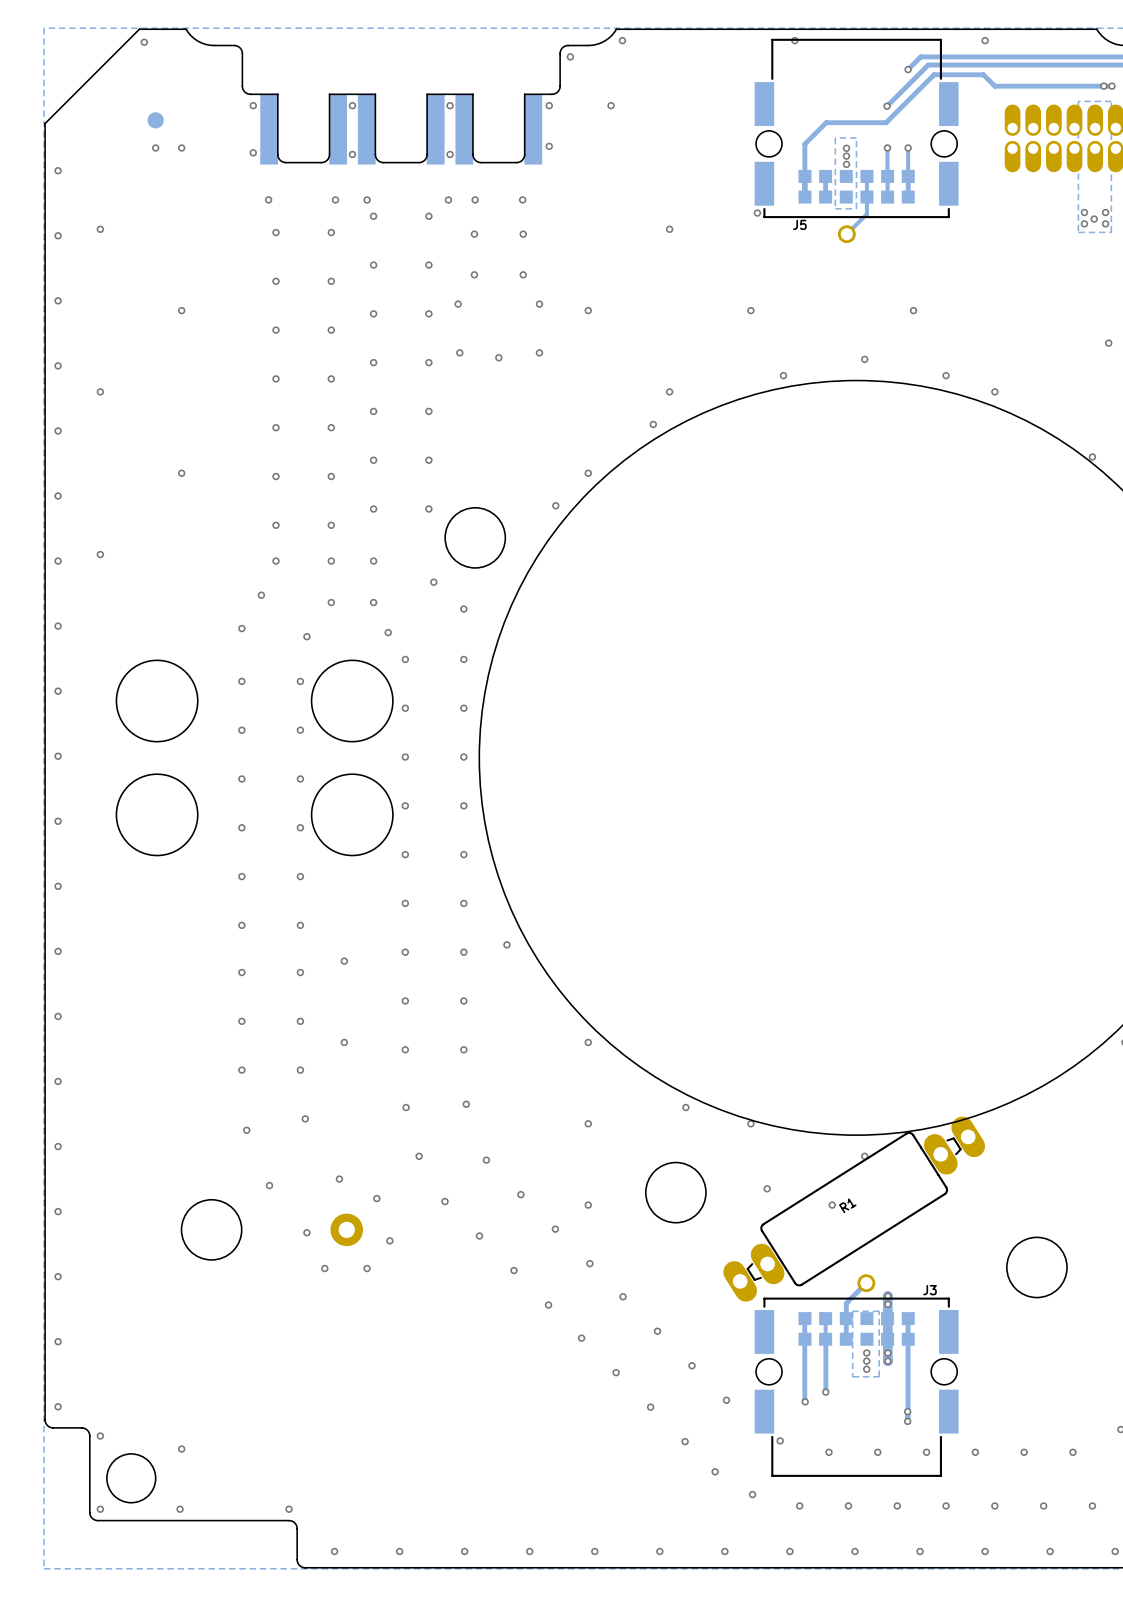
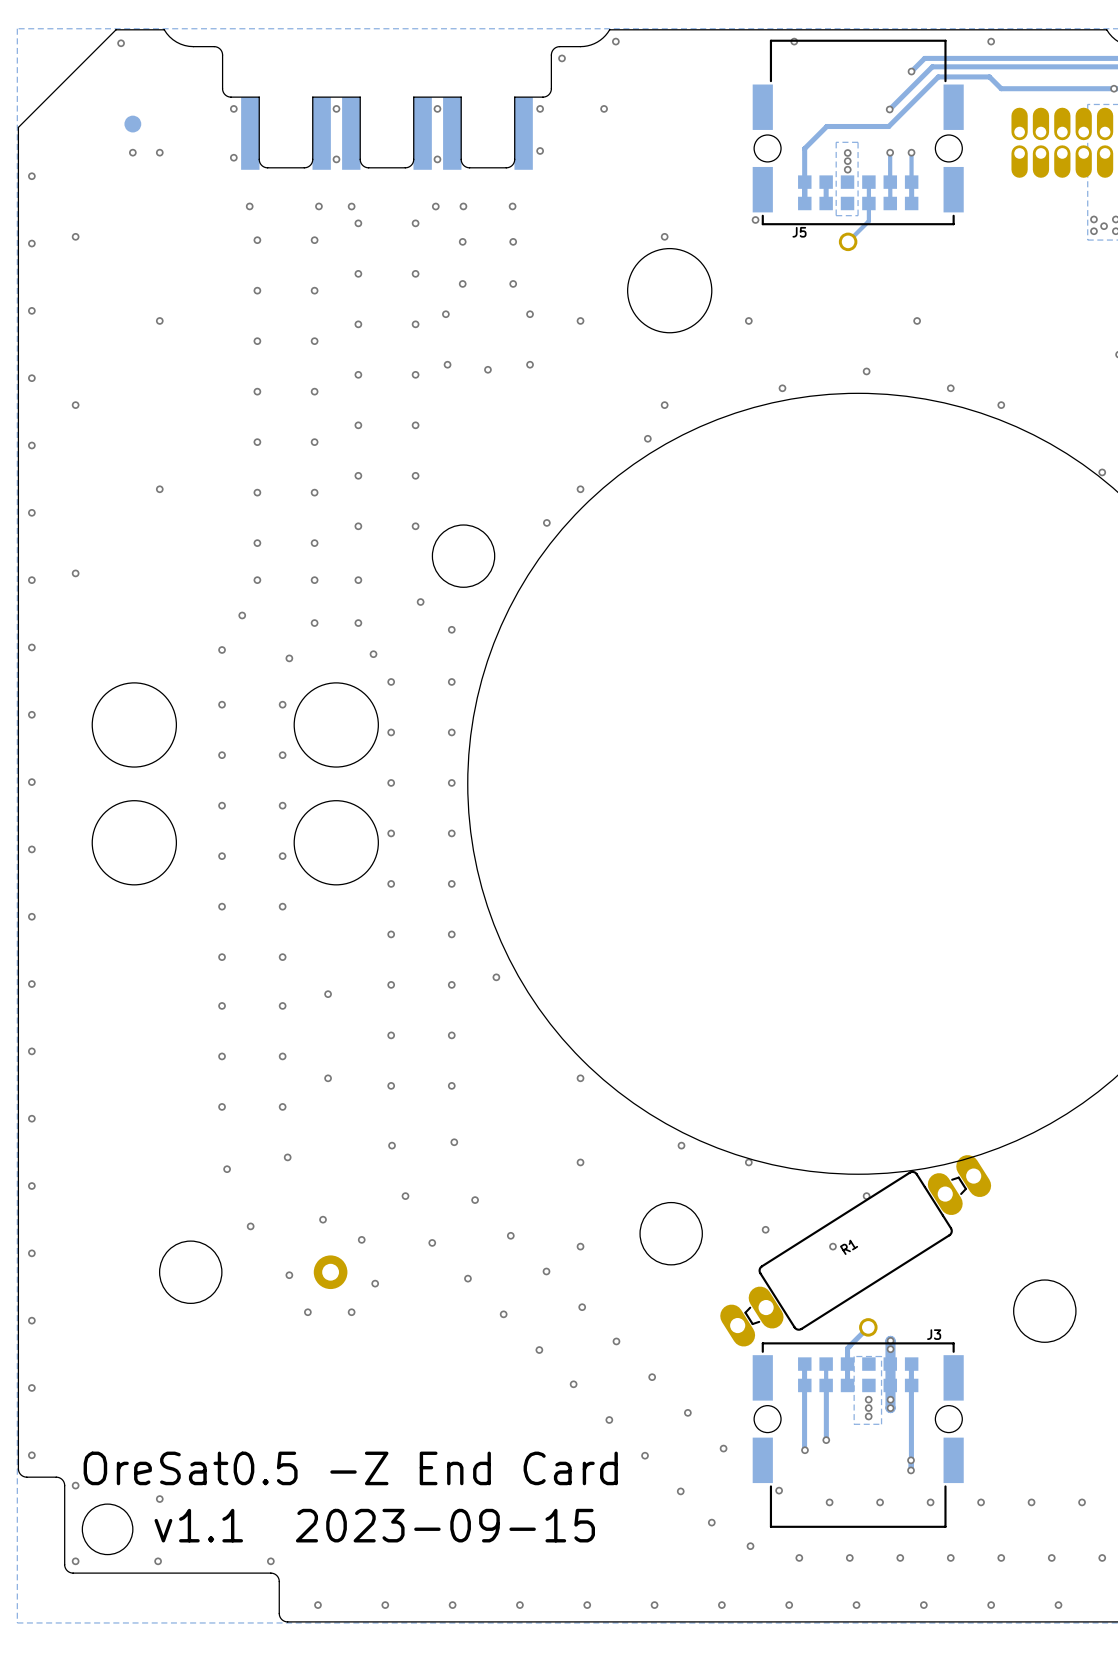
round board edge: none -> [627, 248, 712, 333]
text: none -> OreSat0.5 -Z End Card (350, 1468)
text: none -> v1.1 2023-09-15 (374, 1525)

